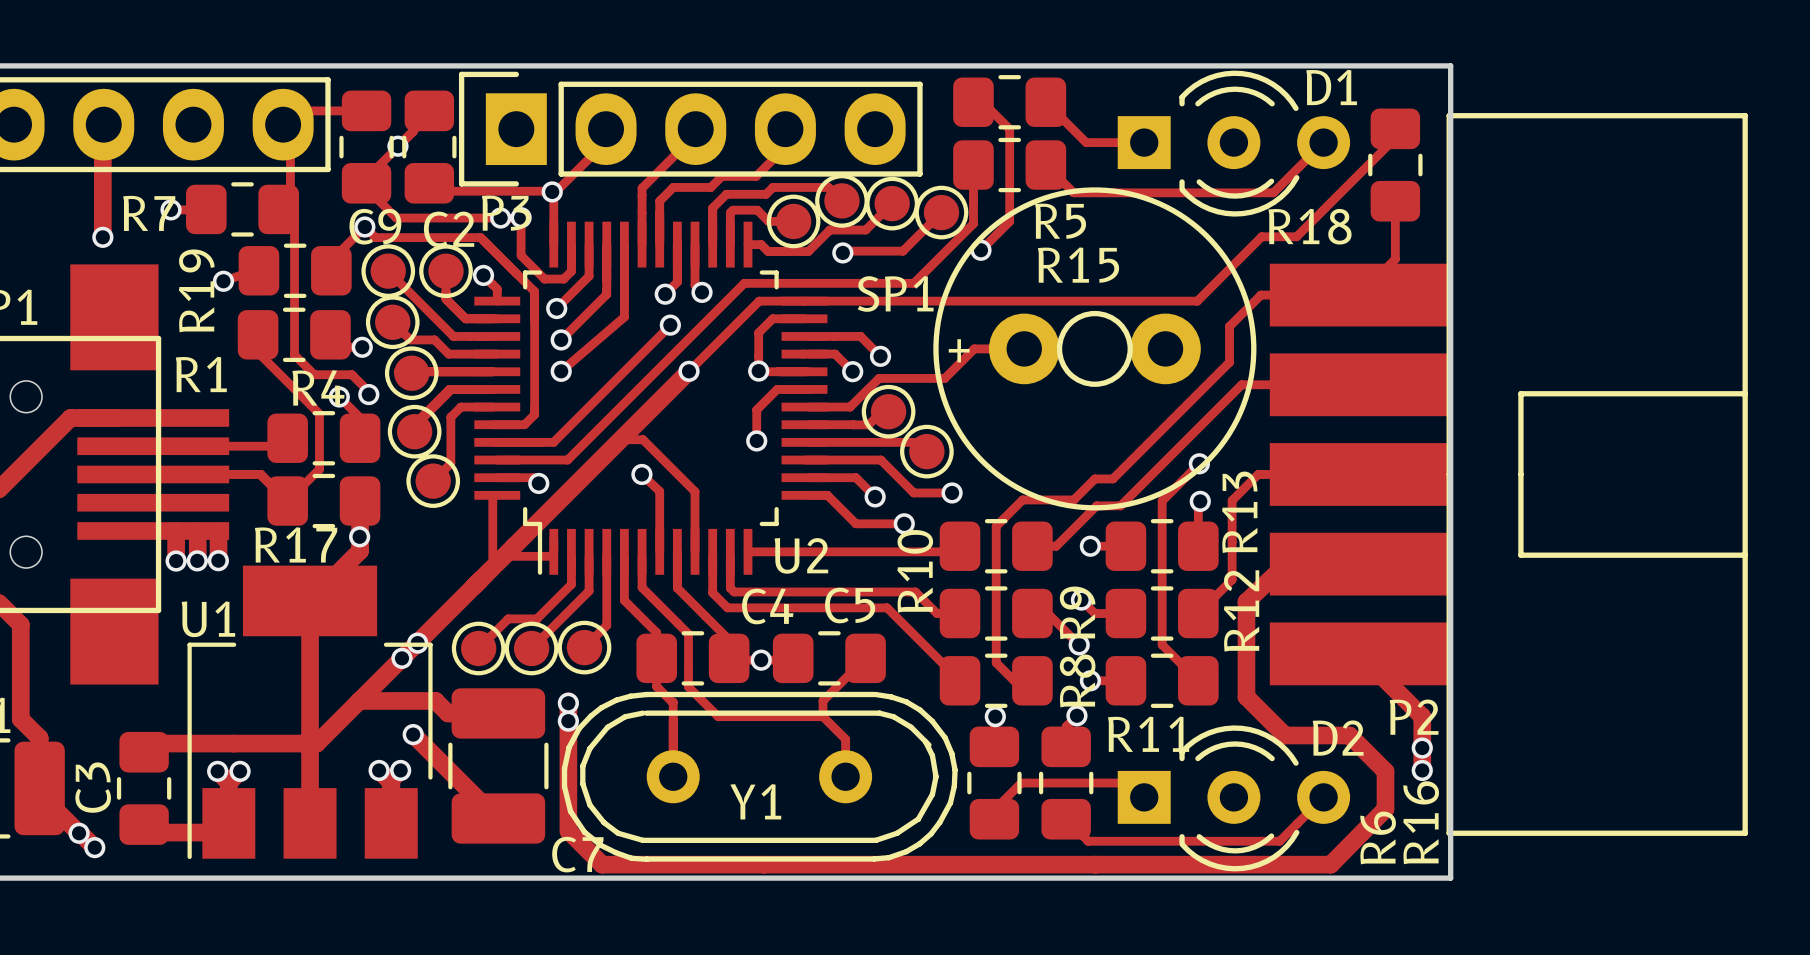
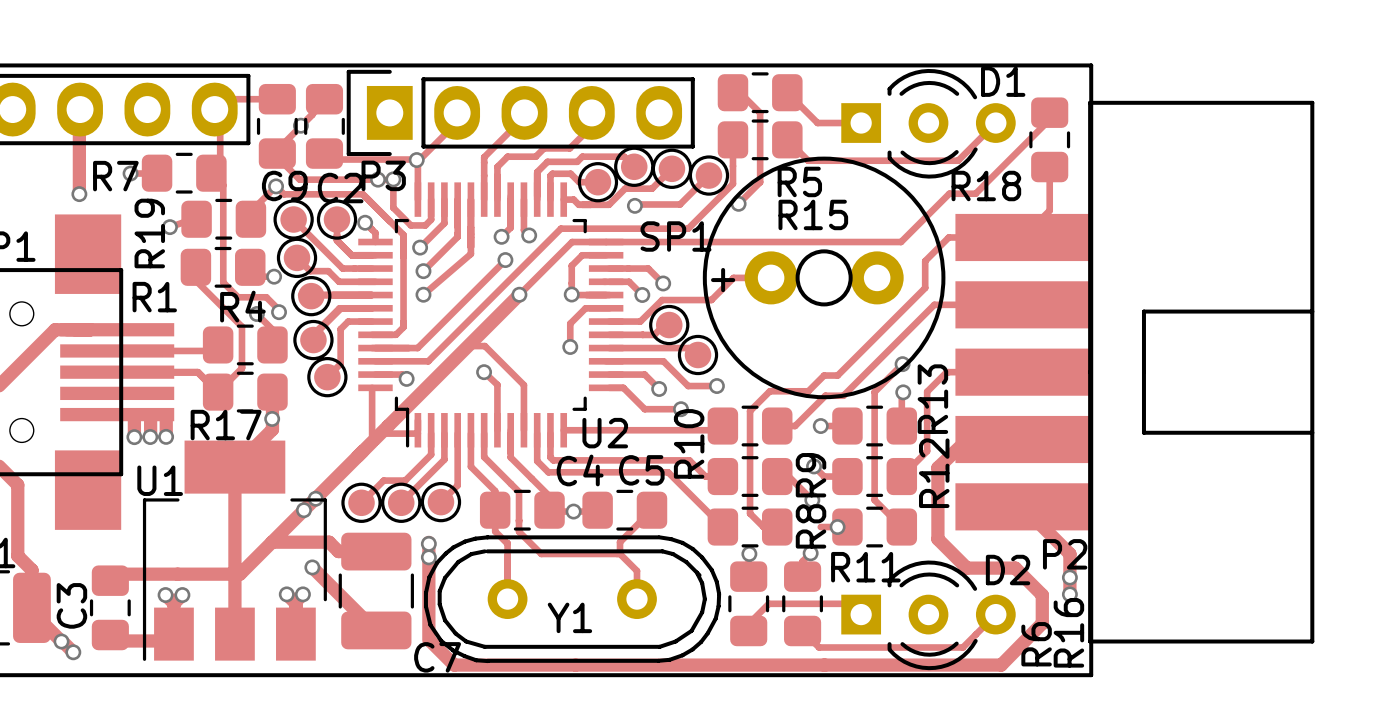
via position: (1090, 680) -> (837, 527)

